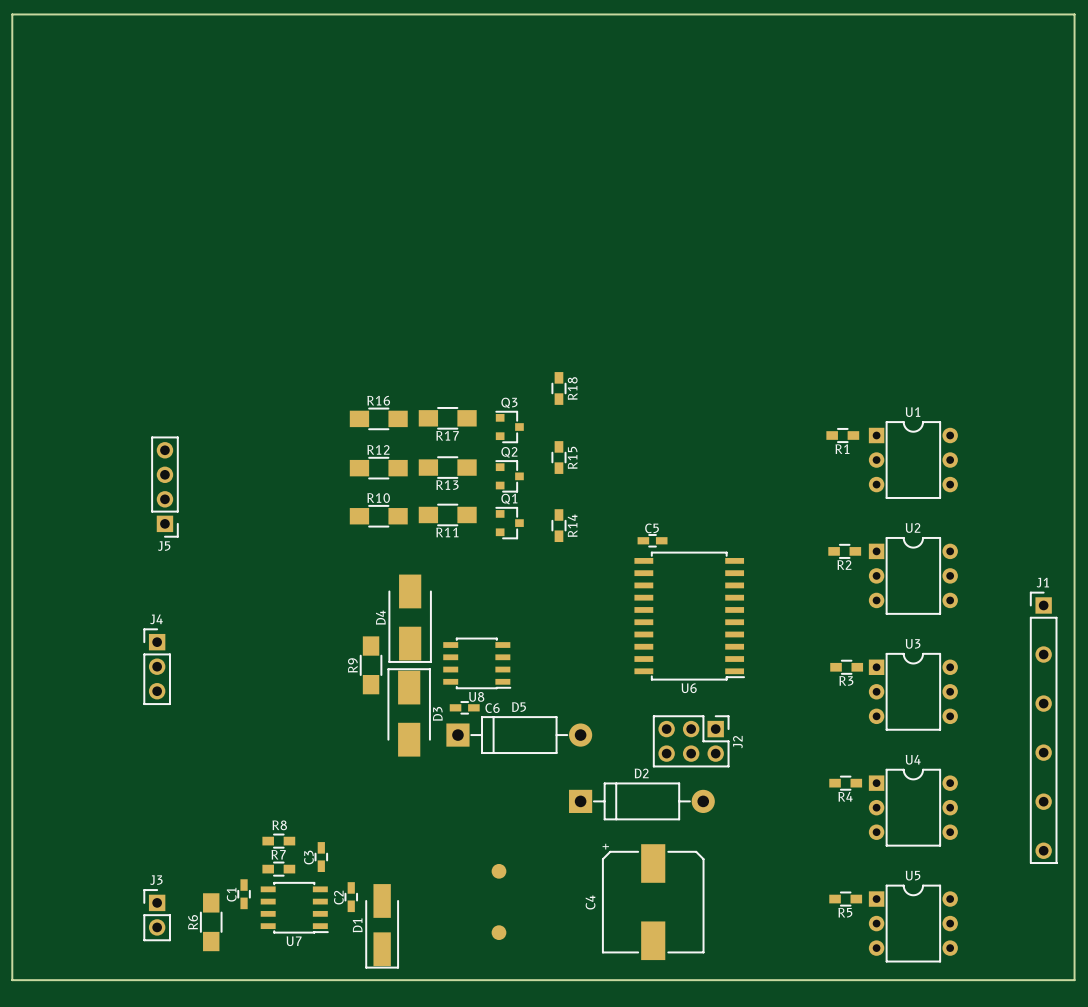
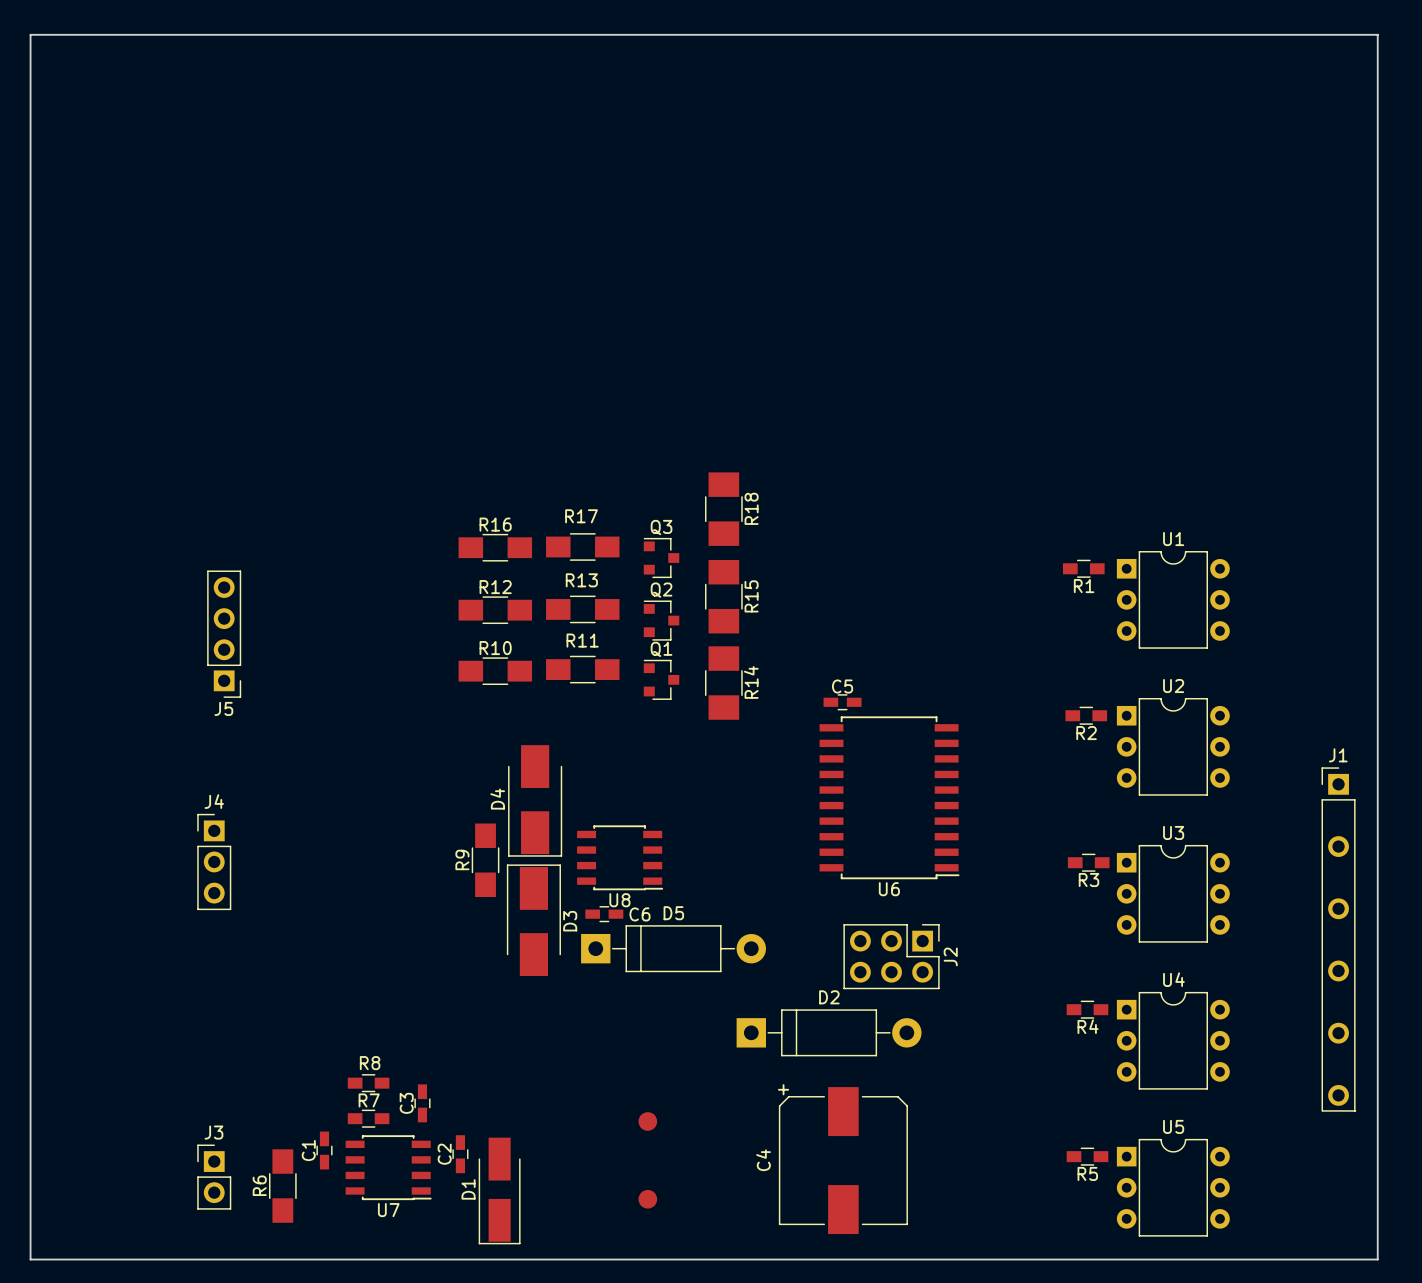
R18 footprint: [551, 372, 567, 405] -> [705, 472, 743, 546]
R17 name position: R17 (447, 435) -> R17 (581, 516)
R15 footprint: [551, 441, 567, 474] -> [705, 559, 743, 634]
R13 name position: R13 (447, 485) -> R13 (581, 580)
R14 footprint: [551, 509, 567, 543] -> [705, 646, 743, 720]
R11 name position: R11 (447, 532) -> R11 (582, 640)

